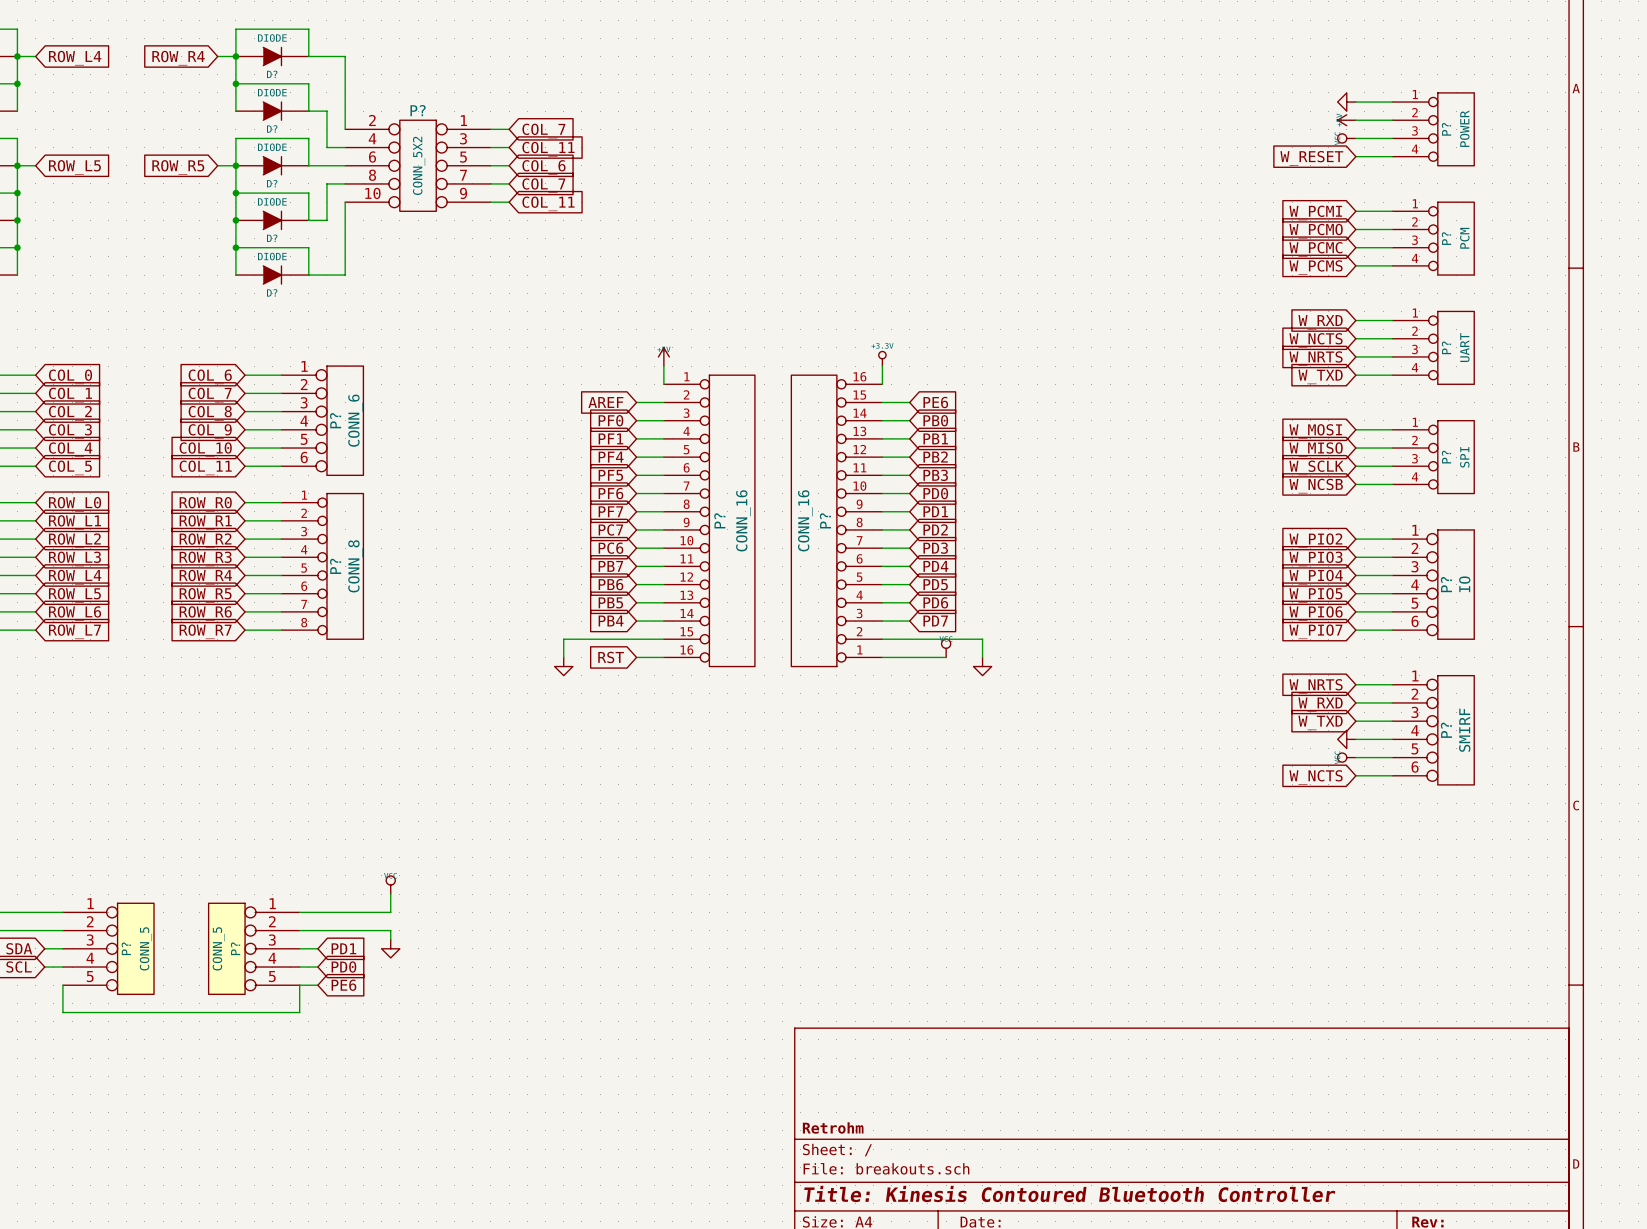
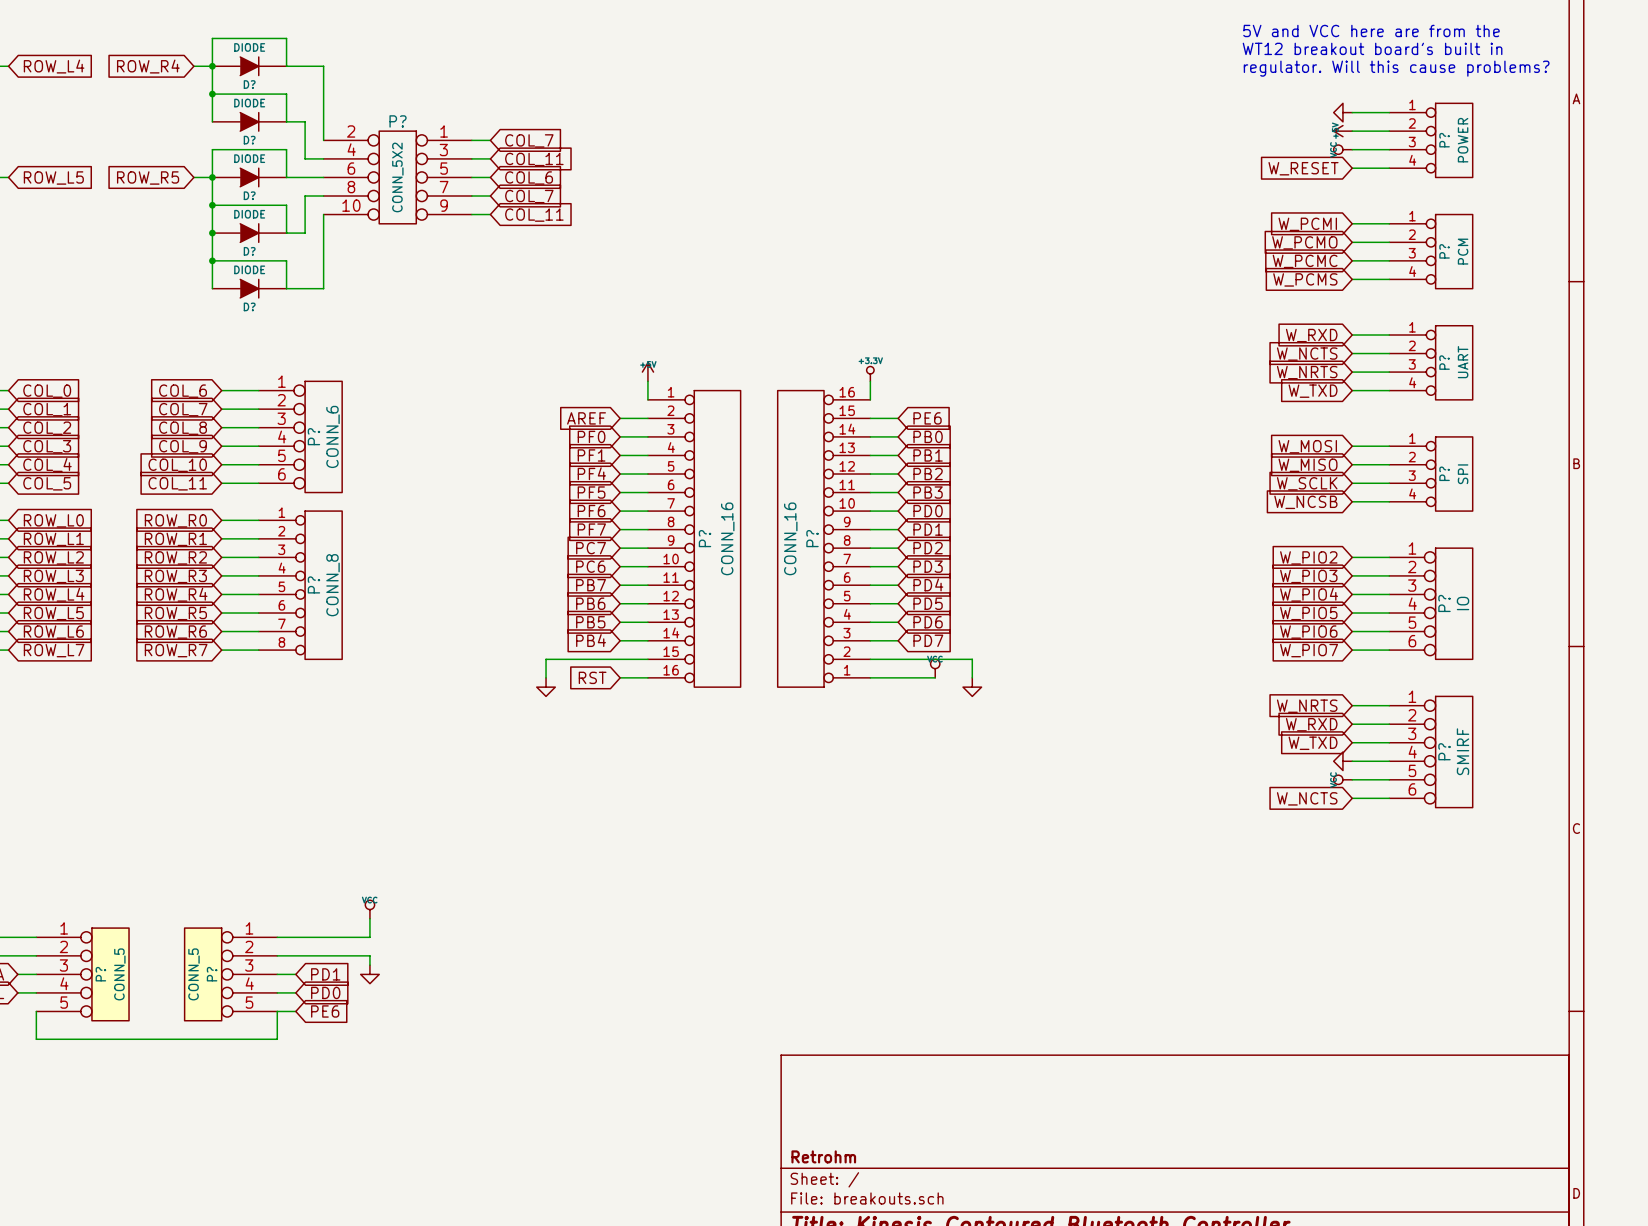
text: none -> 5V and VCC here are from the (1371, 30)
text: none -> WT12 breakout board's built in (1372, 48)
text: none -> regulator. Will this cause problems? (1396, 68)

